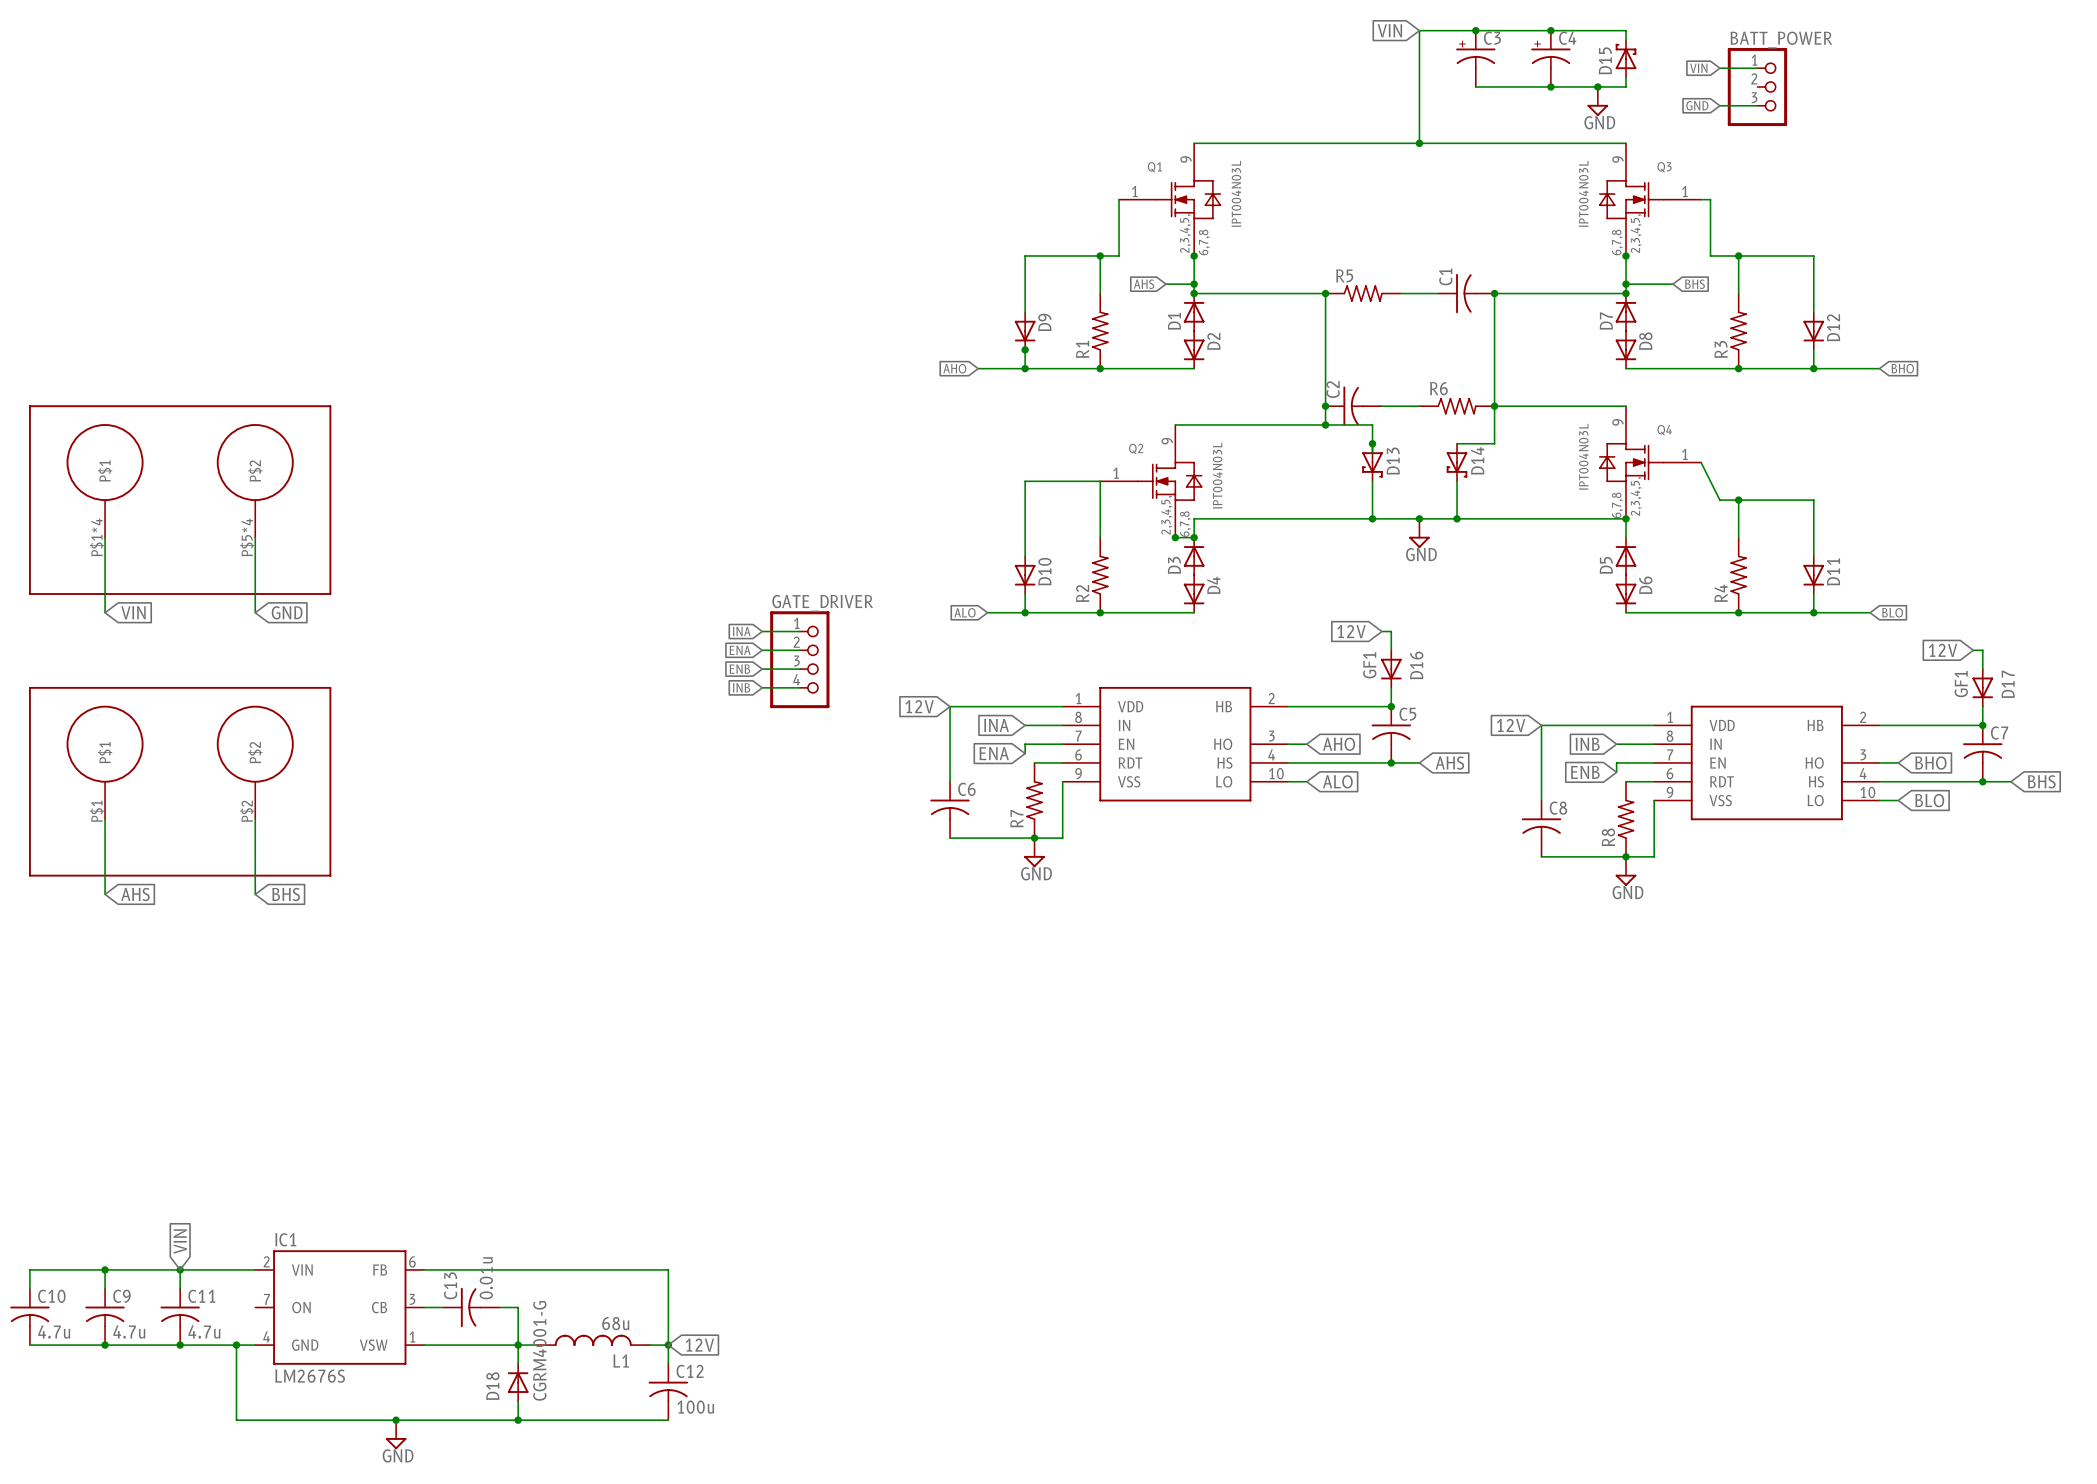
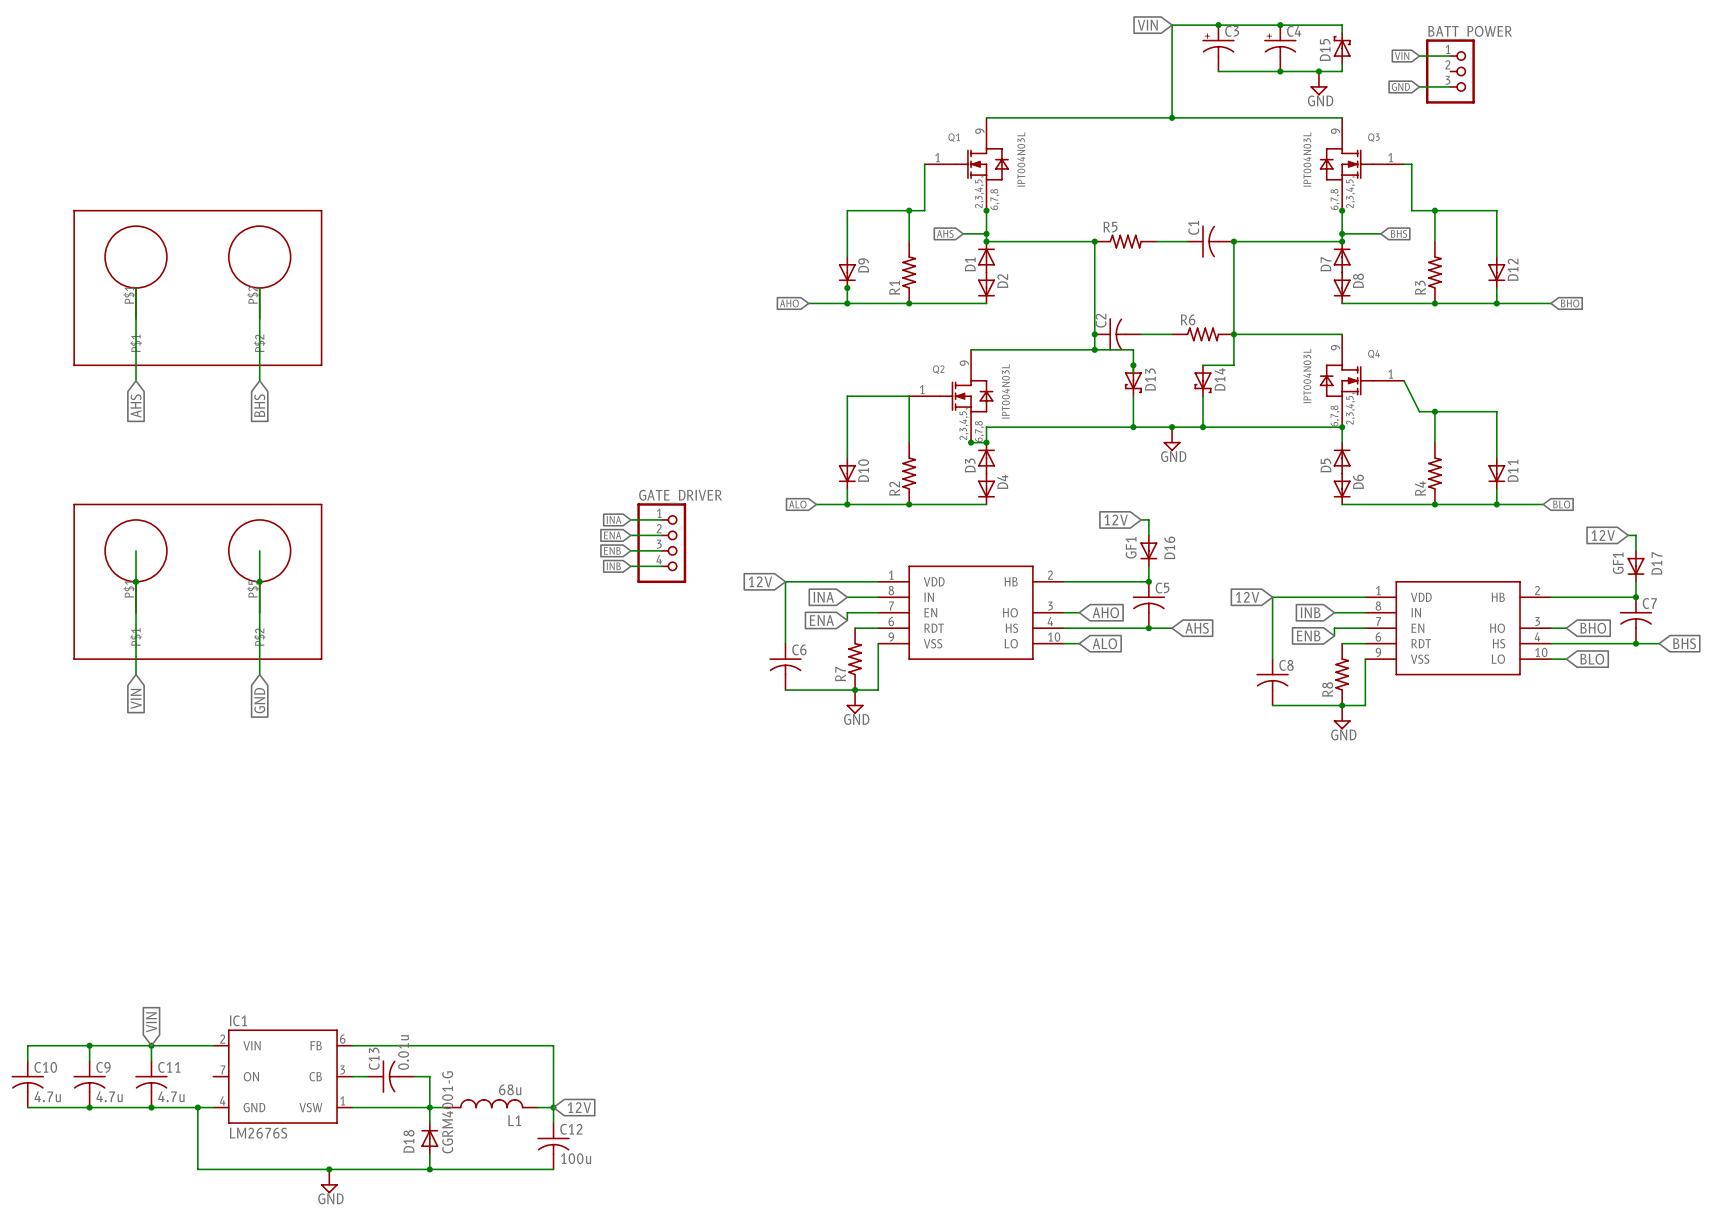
wire: none -> (136, 287) (136, 380)
part: none -> (197, 287)
wire: none -> (259, 287) (259, 380)
global label: none -> BHS (259, 405)
global label: none -> AHS (136, 406)
part: (180, 500) -> none
wire: (105, 537) (105, 612) -> none
wire: (255, 537) (255, 612) -> none
global label: VIN (133, 612) -> none
global label: GND (287, 612) -> none
wire: none -> (136, 550) (136, 674)
wire: none -> (259, 550) (259, 674)
junction: none -> (136, 581)
part: none -> (197, 581)
junction: none -> (259, 581)
part: (180, 781) -> none
wire: (105, 819) (105, 894) -> none
wire: (255, 819) (255, 894) -> none
global label: none -> VIN (136, 698)
global label: none -> GND (259, 700)
global label: AHS (135, 894) -> none
global label: BHS (286, 894) -> none

